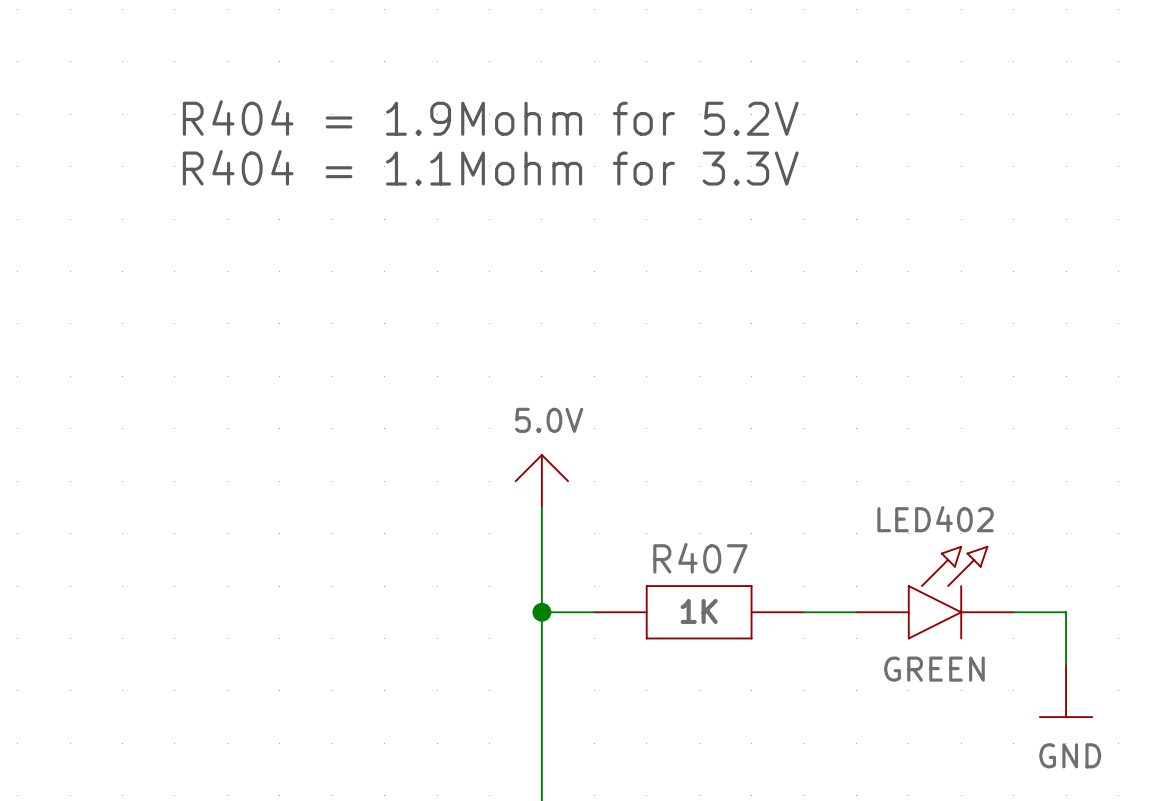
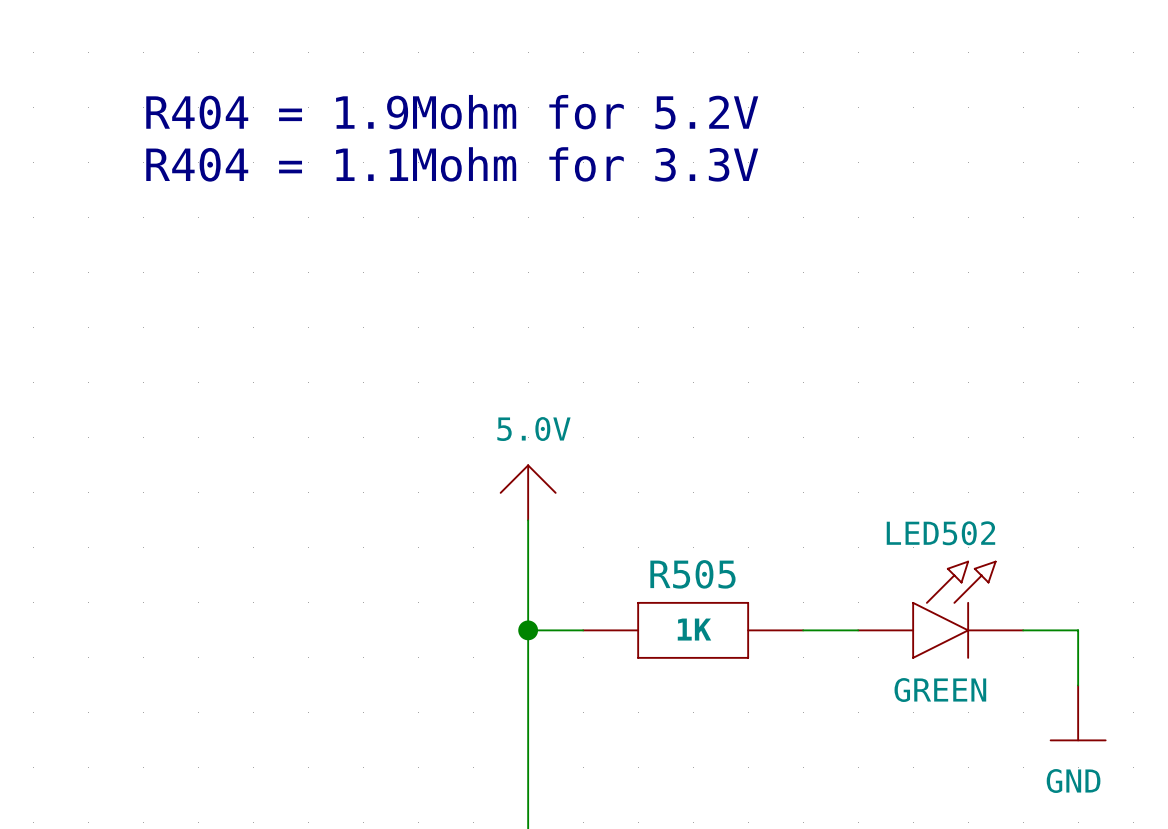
LED402 name: LED402 (935, 519) -> LED502 (940, 533)
R407 name: R407 (700, 558) -> R505 (692, 574)

